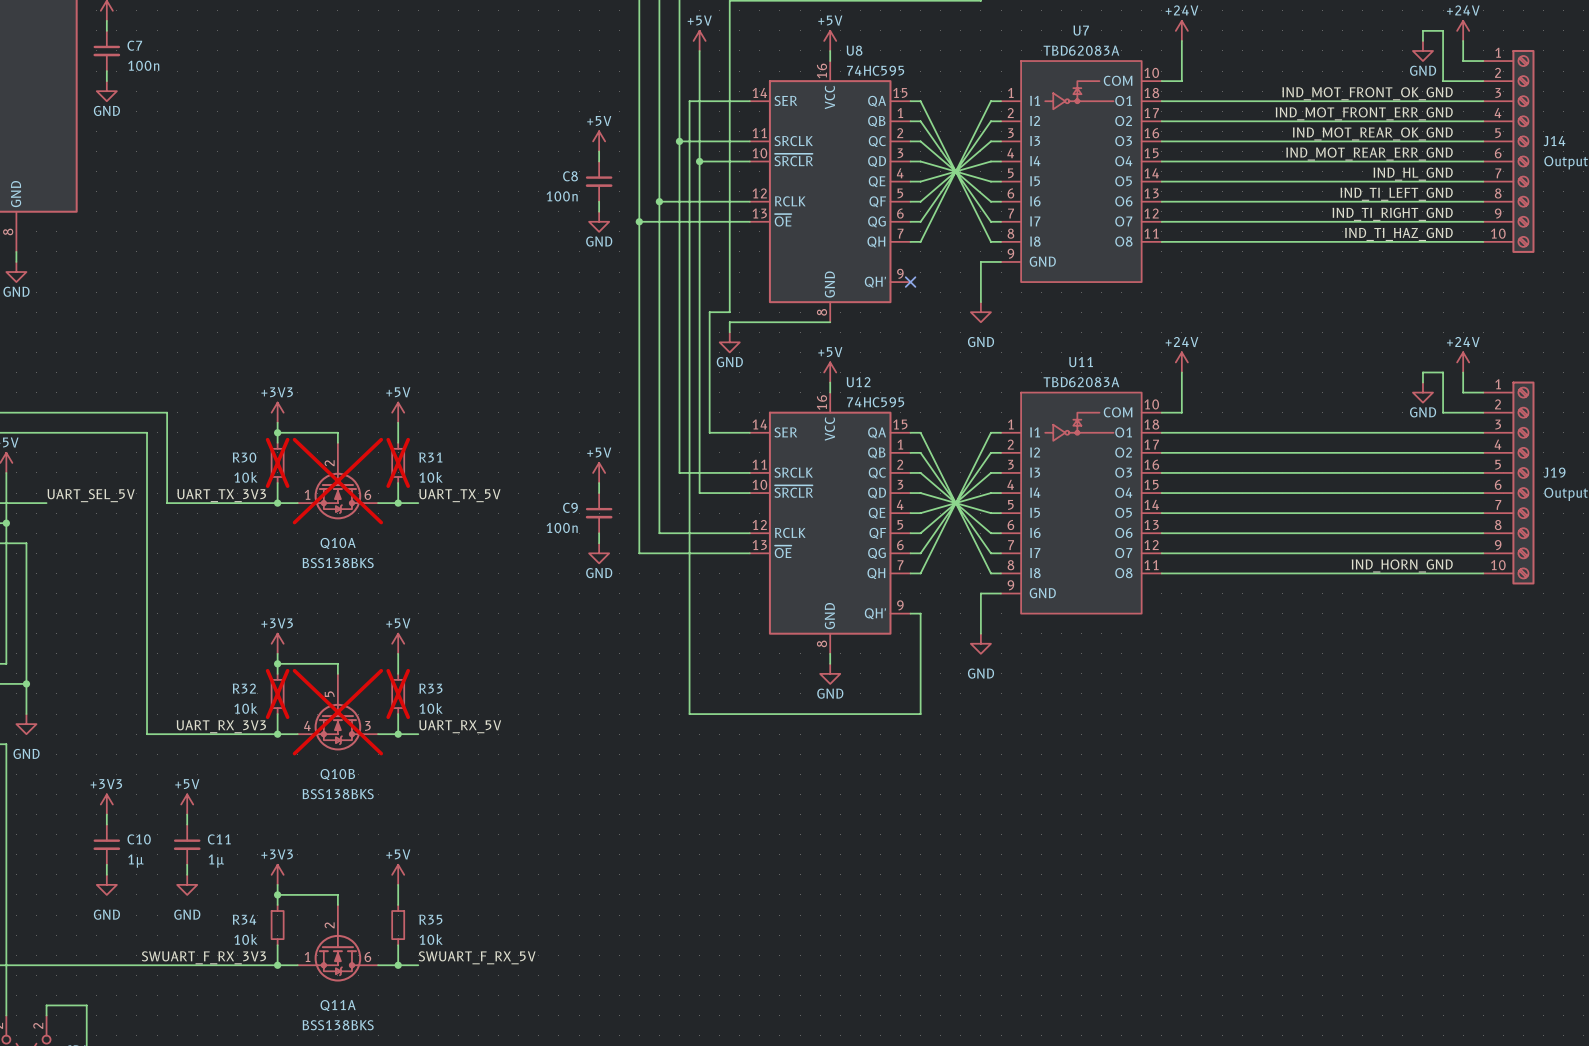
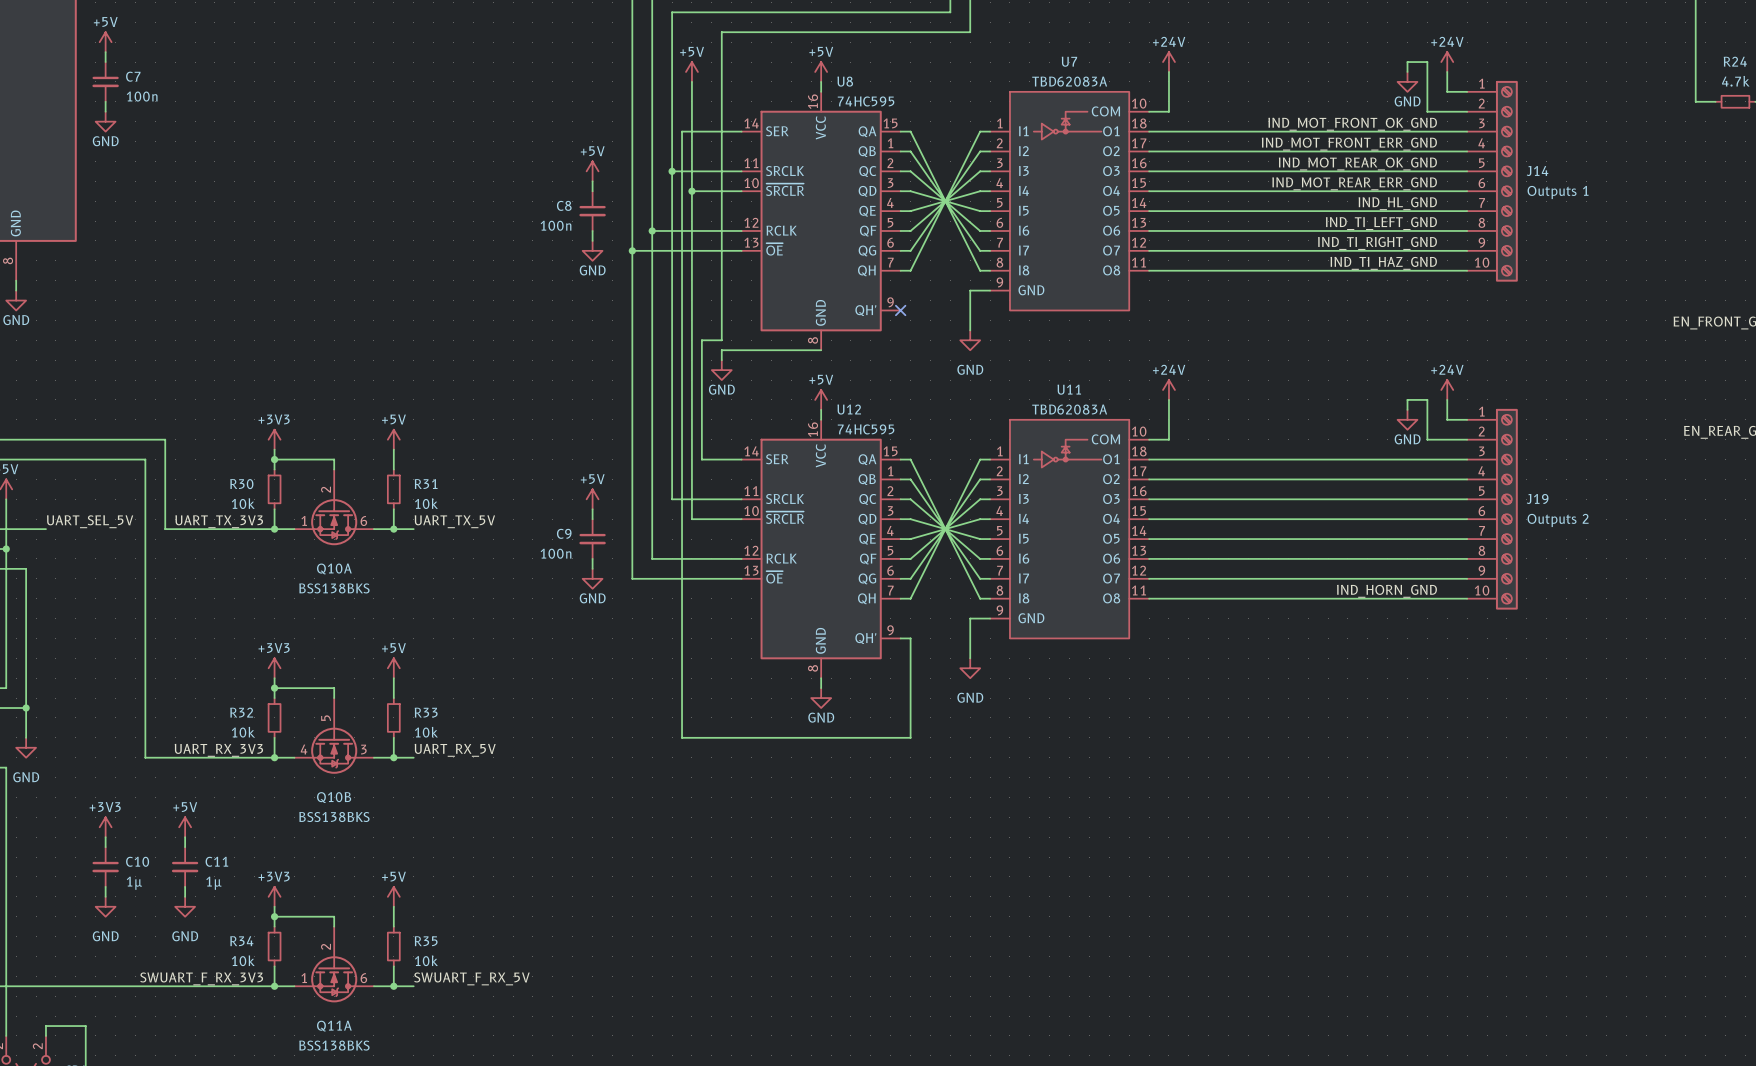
R30 do-not-place cross: (277, 462) -> none
R31 do-not-place cross: (398, 462) -> none
Q10A do-not-place cross: (337, 481) -> none
R32 do-not-place cross: (277, 693) -> none
R33 do-not-place cross: (398, 693) -> none
Q10B do-not-place cross: (337, 712) -> none

